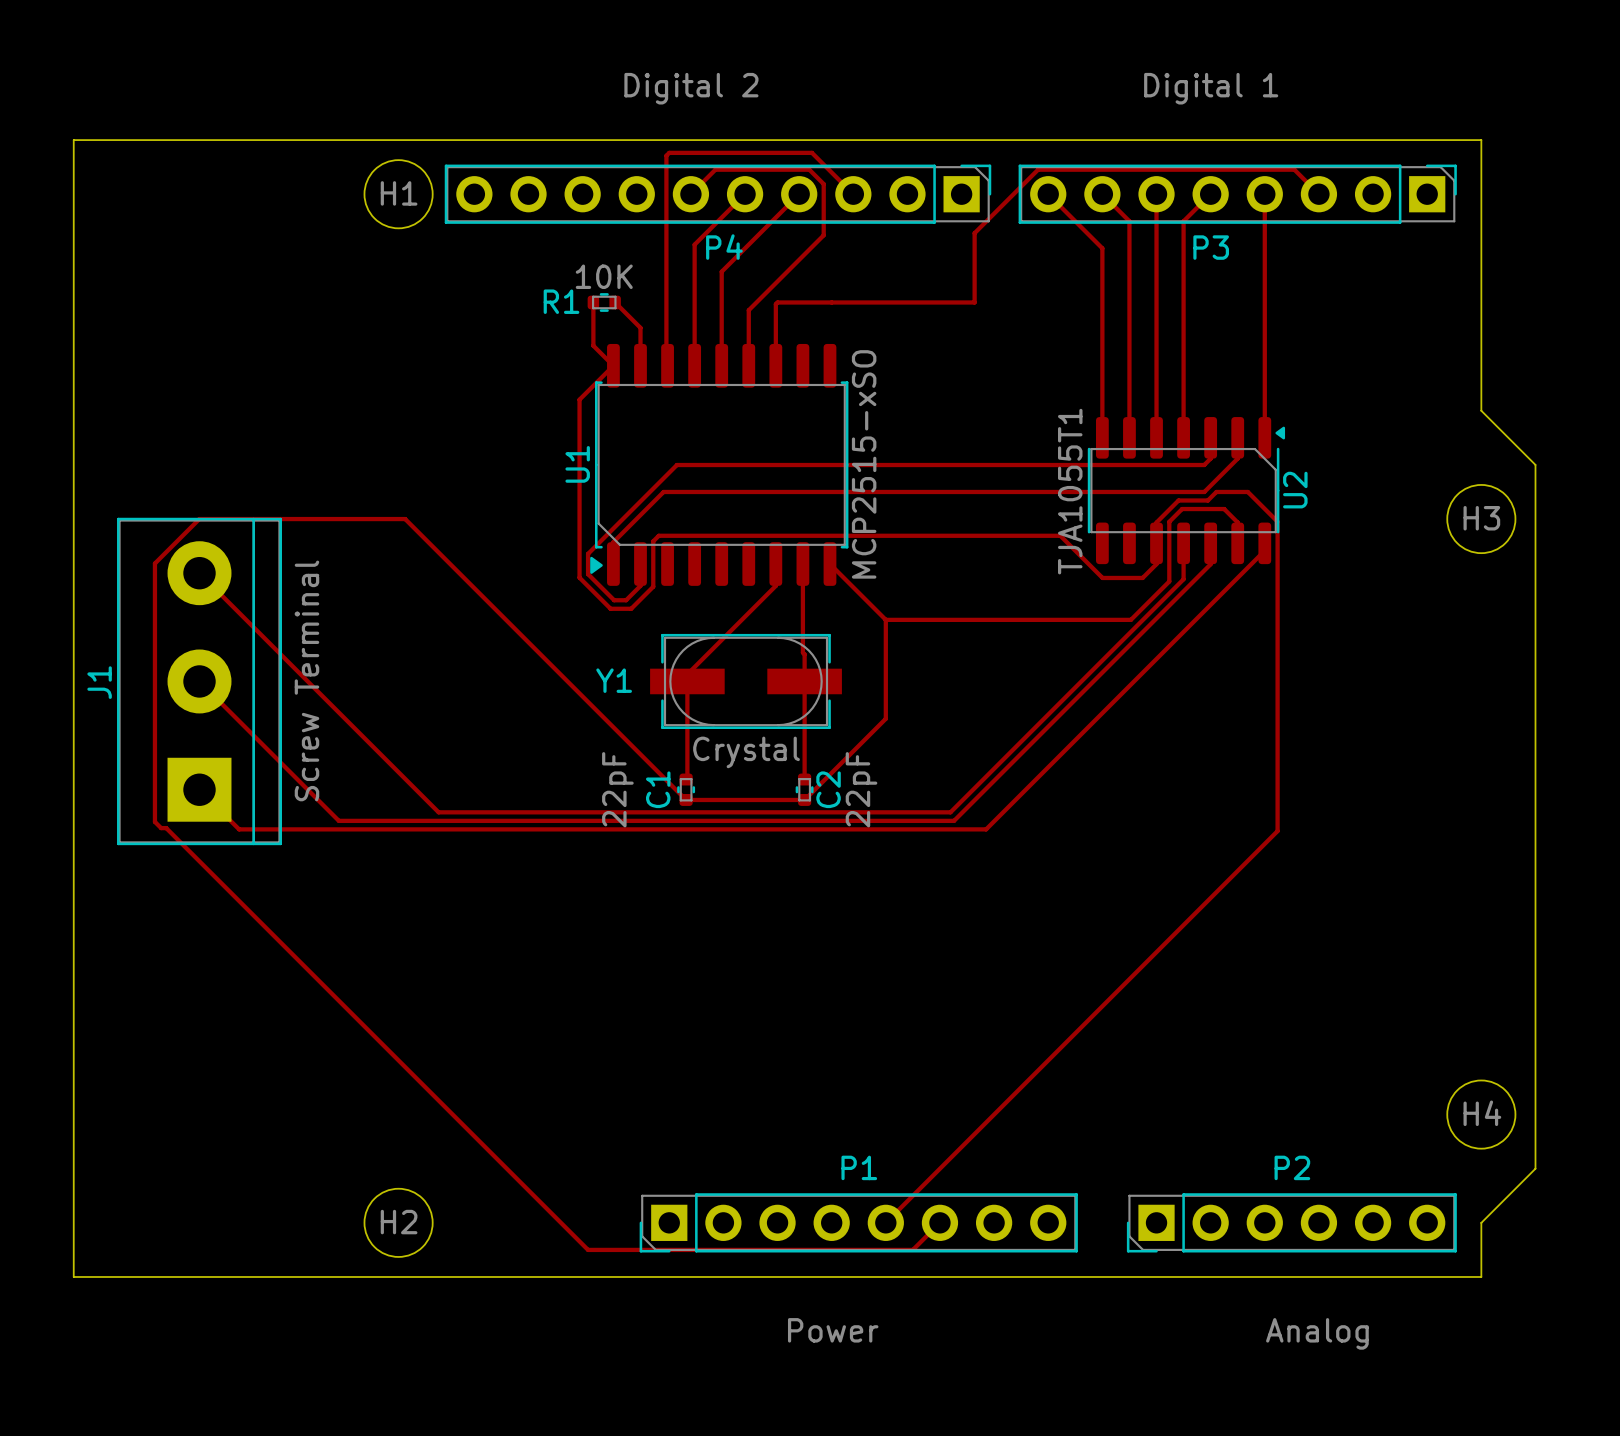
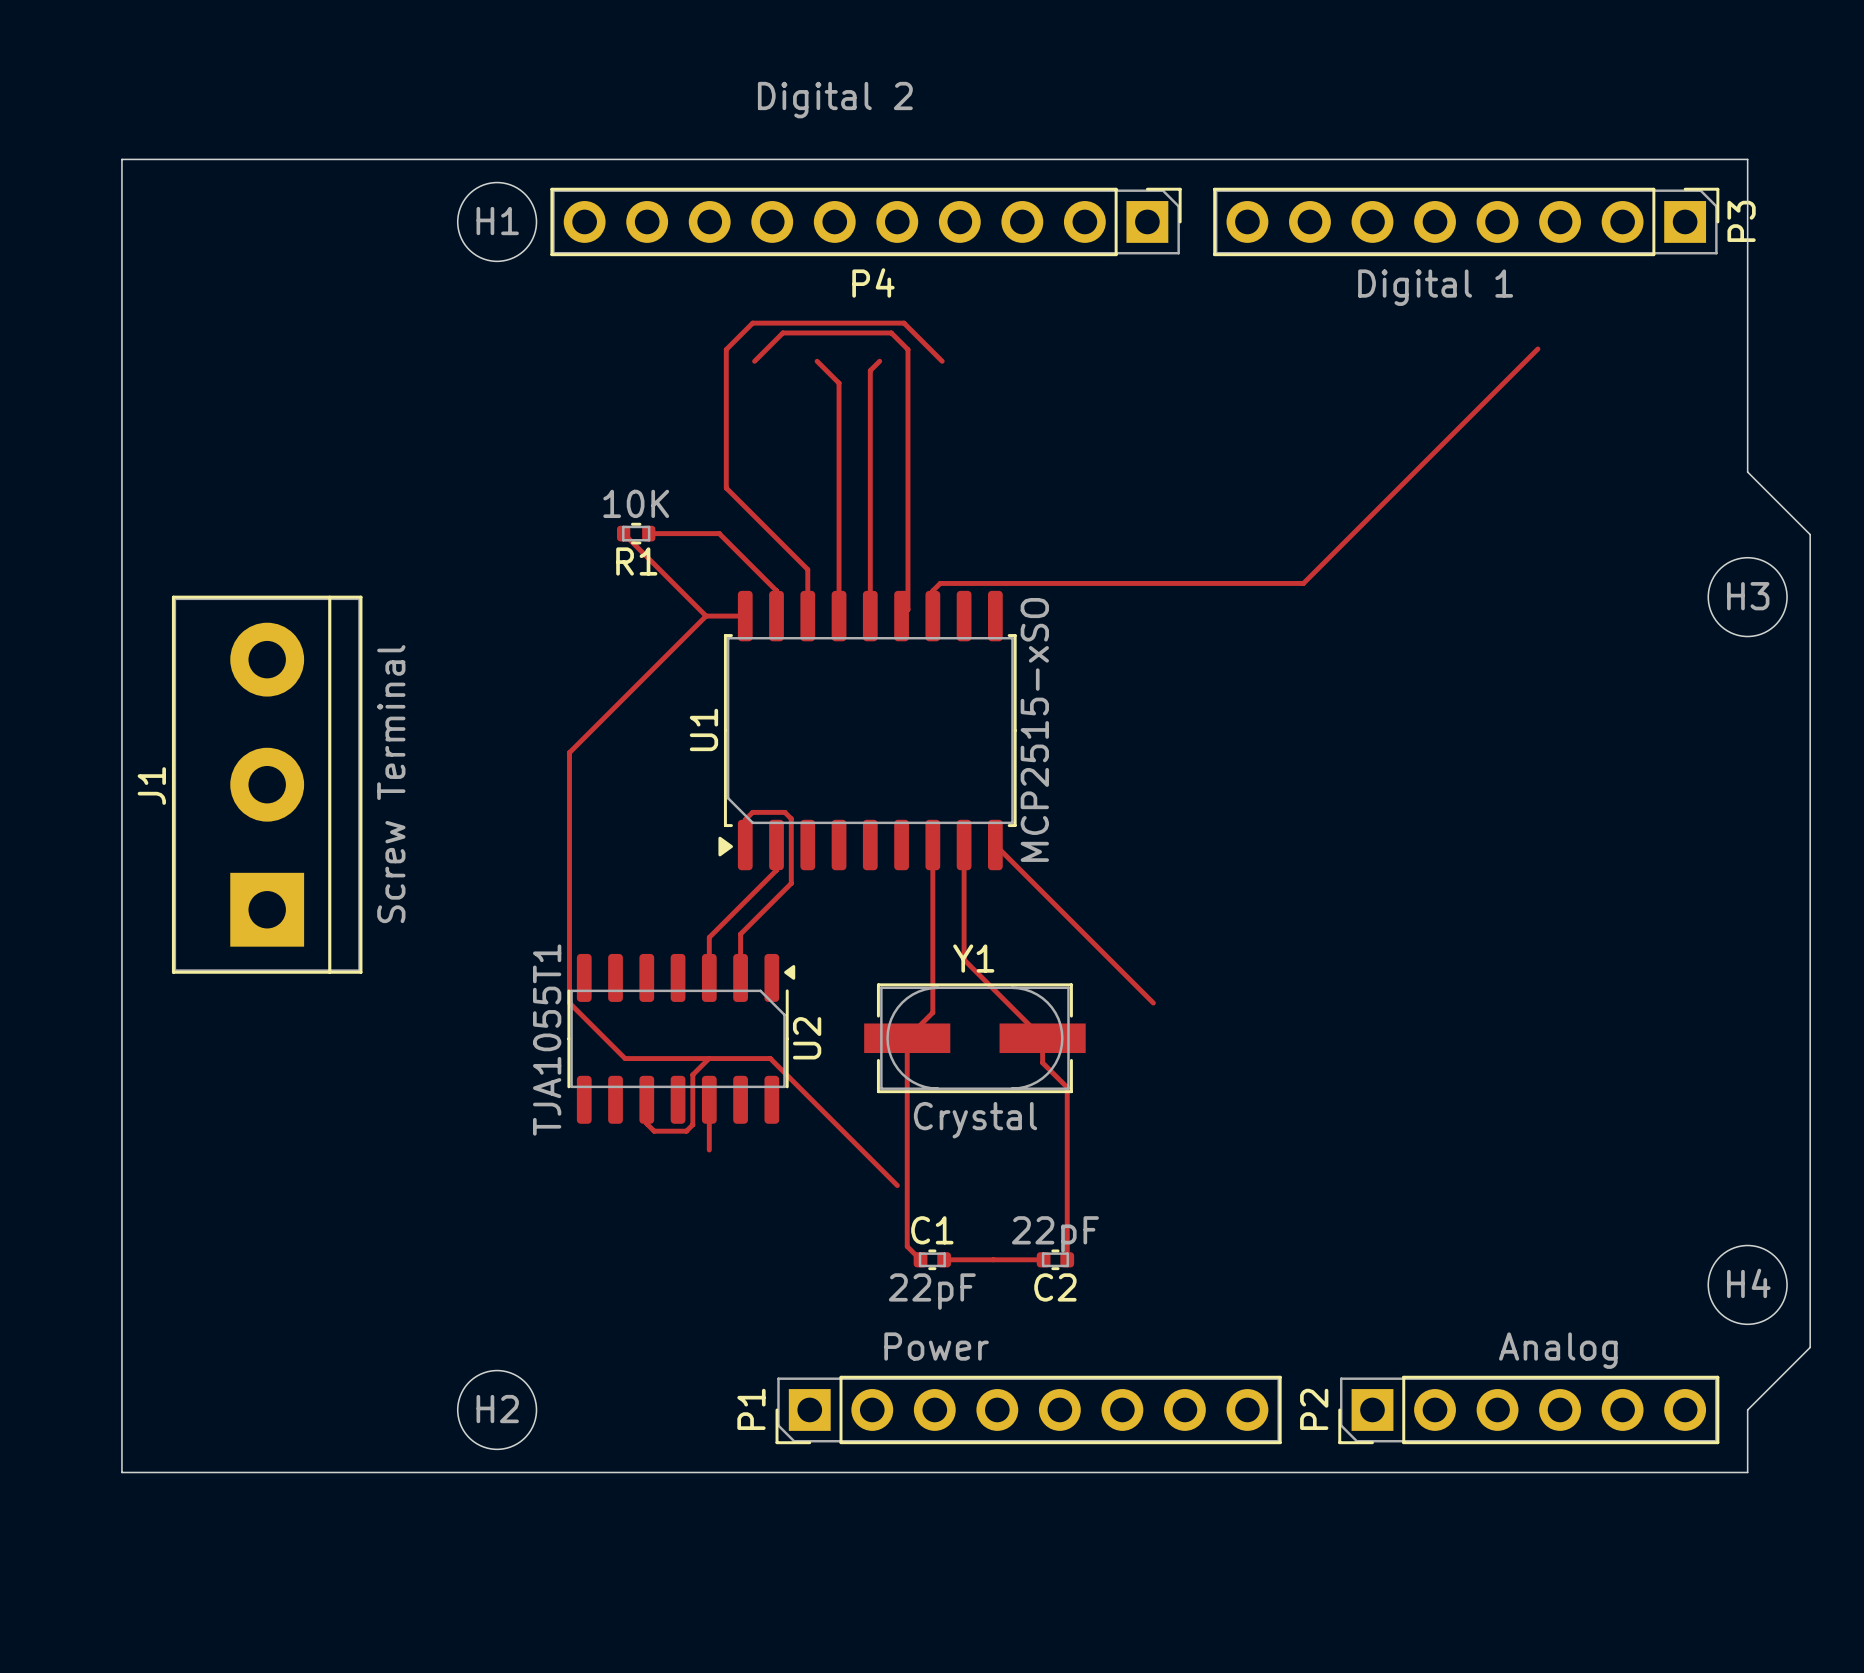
P3 value position: Digital 1 (1211, 88) -> Digital 1 (1435, 287)
top track: (690, 194) (715, 169) (809, 169) (823, 184) (823, 235) (748, 310) (748, 365) -> none
top track: (745, 194) (694, 244) (694, 333) -> (817, 361) (839, 383)
top track: (799, 194) (721, 271) (721, 322) -> (879, 361) (870, 370)
top track: (853, 194) (811, 152) (669, 152) (666, 155) (667, 365) -> none
top track: (1048, 194) (1102, 248) (1102, 437) -> none
top track: (1102, 194) (1129, 221) (1129, 437) -> none
top track: (1156, 194) (1156, 437) -> none
top track: (1210, 194) (1183, 221) (1183, 437) -> none
top track: (1264, 194) (1264, 437) -> none
top track: (1318, 194) (1294, 169) (1038, 169) (974, 233) (974, 302) (777, 302) (775, 304) (775, 365) -> none
P3 name rotation: 0° (1211, 247) -> 90° counterclockwise (1741, 221)
P3 name position: P3 (1211, 247) -> P3 (1741, 221)
R1 name position: R1 (561, 301) -> R1 (636, 561)
top track: (593, 302) (593, 345) (613, 365) (579, 399) (579, 577) (610, 608) (631, 608) (653, 586) (653, 541) (658, 535) (1060, 535) (1102, 577) (1142, 577) (1156, 564) (1156, 522) (1178, 500) (1207, 500) (1216, 491) (1247, 491) (1277, 521) (1277, 831) (885, 1222) -> none
R1 position: (604, 302) -> (636, 533)
top track: (615, 302) (640, 327) (640, 365) -> none
top track: none -> (1537, 348) (1303, 583) (940, 583) (932, 590) (932, 616)
top track: none -> (754, 361) (782, 332) (891, 332) (907, 349) (907, 609) (901, 616)
top track: none -> (942, 361) (904, 323) (752, 323) (726, 349) (726, 488) (807, 569) (807, 631)
top track: none -> (839, 420) (839, 616)
top track: none -> (870, 420) (870, 616)
top track: (1210, 437) (1210, 458) (1204, 465) (676, 465) (588, 553) (588, 574) (614, 600) (626, 600) (640, 585) (640, 564) -> none
top track: (1237, 437) (1237, 458) (1204, 491) (663, 491) (613, 542) (613, 564) -> none
top track: none -> (623, 533) (706, 616)
top track: none -> (648, 533) (719, 533) (776, 590) (776, 616)
U1 position: (719, 464) -> (867, 730)
U2 position: (1186, 490) -> (681, 1038)
top track: none -> (706, 616) (745, 616)
top track: none -> (706, 616) (569, 752) (569, 1002) (625, 1058) (770, 1058) (897, 1185)
top track: (1183, 543) (1183, 579) (950, 812) (438, 812) (199, 573) -> none
top track: (1210, 543) (1210, 564) (954, 820) (338, 820) (199, 681) -> none
top track: (1237, 543) (1237, 522) (1224, 509) (1182, 509) (1169, 521) (1169, 581) (1130, 619) (885, 619) -> none
top track: (1264, 543) (1264, 550) (986, 829) (239, 829) (199, 789) -> none
top track: (775, 564) (775, 585) (687, 674) (686, 779) -> none
top track: (802, 564) (804, 779) -> none
top track: (829, 564) (885, 619) -> none
top track: (885, 619) (885, 718) (804, 799) (686, 799) (405, 519) (199, 519) (154, 563) (154, 821) (161, 828) (166, 828) (588, 1249) (912, 1249) (939, 1222) -> none
Y1 name position: Y1 (614, 680) -> Y1 (973, 958)
Y1 position: (746, 681) -> (974, 1038)
top track: none -> (745, 845) (745, 819) (752, 812) (784, 812) (791, 818) (791, 883) (740, 934) (740, 977)
top track: none -> (776, 845) (776, 870) (709, 937) (709, 977)
top track: none -> (932, 845) (932, 1012) (907, 1038) (907, 1246) (920, 1259)
top track: none -> (964, 845) (964, 959) (1042, 1038) (1042, 1062) (1067, 1087) (1067, 1259)
top track: none -> (995, 845) (1153, 1003)
C1 value position: 22pF (617, 789) -> 22pF (932, 1291)
C1 rotation: 0° (686, 789) -> 90° clockwise (932, 1259)
C1 position: (686, 789) -> (932, 1259)
C2 rotation: 0° (804, 789) -> 90° clockwise (1055, 1259)
C2 position: (804, 789) -> (1055, 1259)
C2 value position: 22pF (861, 789) -> 22pF (1055, 1234)
top track: none -> (709, 1058) (692, 1074) (692, 1124) (686, 1131) (654, 1131) (646, 1123) (646, 1099)
top track: none -> (709, 1099) (709, 1150)
top track: none -> (944, 1259) (1043, 1259)
P1 name rotation: 0° (859, 1167) -> 90° counterclockwise (751, 1409)
P1 name position: P1 (859, 1167) -> P1 (751, 1409)
P2 name rotation: 0° (1292, 1167) -> 90° counterclockwise (1314, 1409)
P2 name position: P2 (1292, 1167) -> P2 (1314, 1409)
P1 value position: Power (833, 1330) -> Power (936, 1346)
P2 value position: Analog (1317, 1333) -> Analog (1558, 1350)

